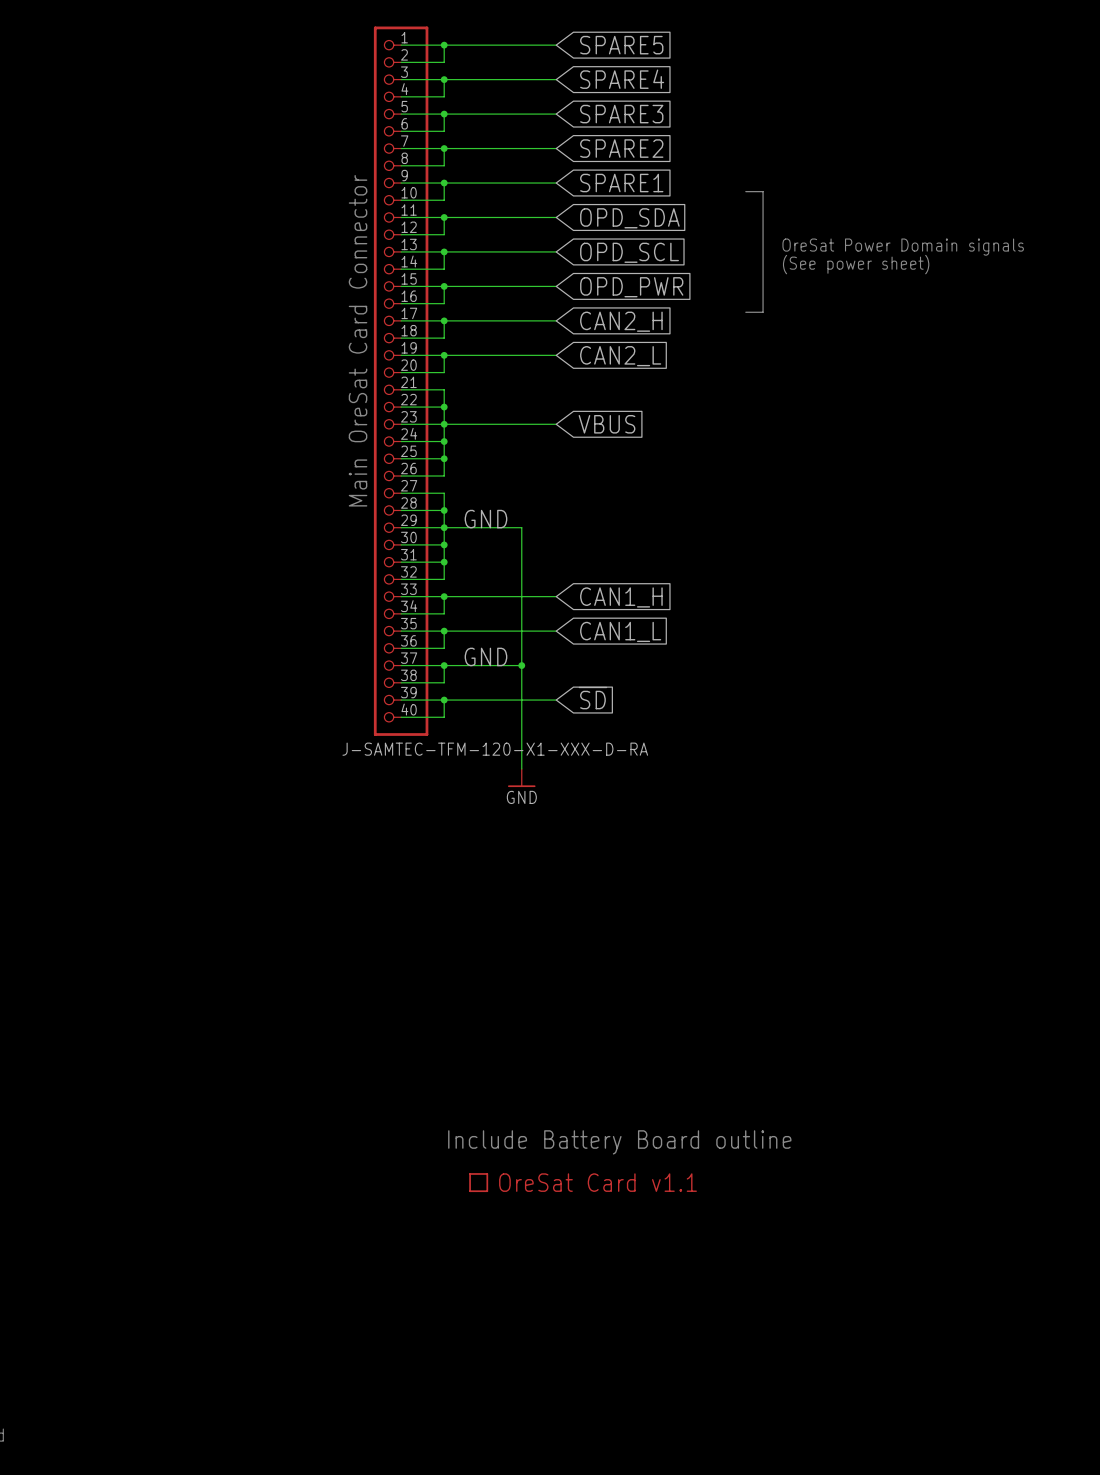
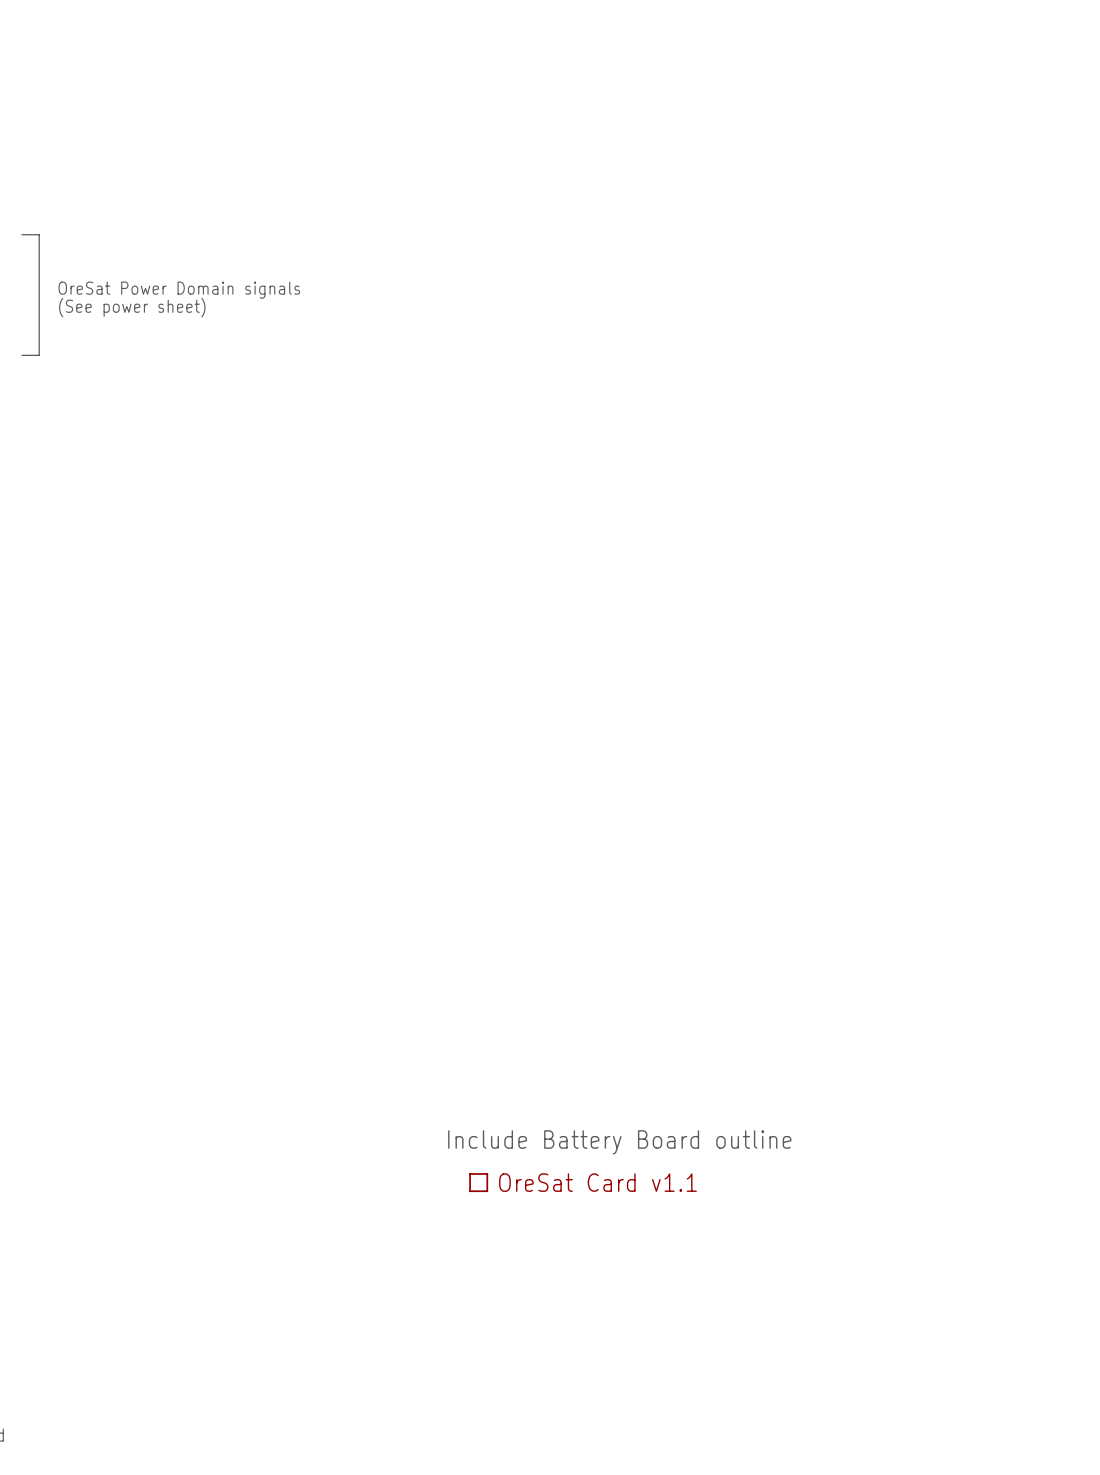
wire: (401, 45) (556, 45) -> none
wire: (444, 45) (444, 62) (401, 62) -> none
junction: (444, 45) -> none
global label: SPARE5 (621, 45) -> none
wire: (401, 79) (556, 79) -> none
wire: (444, 79) (444, 96) (401, 96) -> none
junction: (444, 79) -> none
global label: SPARE4 (622, 79) -> none
wire: (401, 114) (556, 114) -> none
wire: (444, 114) (444, 131) (401, 131) -> none
junction: (444, 114) -> none
global label: SPARE3 (621, 114) -> none
wire: (401, 148) (556, 148) -> none
wire: (444, 148) (444, 165) (401, 165) -> none
junction: (444, 148) -> none
global label: SPARE2 (621, 148) -> none
wire: (401, 183) (556, 183) -> none
wire: (444, 183) (444, 200) (401, 200) -> none
junction: (444, 183) -> none
global label: SPARE1 (621, 183) -> none
line: (745, 191) (763, 191) (763, 312) (745, 312) -> none
wire: (401, 217) (556, 217) -> none
wire: (444, 217) (444, 234) (401, 234) -> none
junction: (444, 217) -> none
global label: OPD_SDA (629, 218) -> none
line: none -> (21, 234) (39, 234) (39, 355) (21, 355)
text: OreSat Power Domain signals (903, 247) -> none
wire: (401, 251) (556, 251) -> none
wire: (444, 251) (444, 269) (401, 269) -> none
junction: (444, 251) -> none
global label: OPD_SCL (629, 252) -> none
text: (See power sheet) (856, 264) -> none
wire: (401, 286) (556, 286) -> none
wire: (444, 286) (444, 303) (401, 303) -> none
junction: (444, 286) -> none
global label: OPD_PWR (631, 287) -> none
text: none -> OreSat Power Domain signals (179, 290)
text: none -> (See power sheet) (132, 307)
wire: (401, 320) (556, 320) -> none
wire: (444, 320) (444, 338) (401, 338) -> none
junction: (444, 320) -> none
global label: CAN2_H (621, 321) -> none
text: Main OreSat Card Connector (358, 340) -> none
wire: (401, 355) (556, 355) -> none
wire: (444, 355) (444, 372) (401, 372) -> none
junction: (444, 355) -> none
global label: CAN2_L (620, 356) -> none
part: J-SAMTEC-TFM-120-X1-XXX-D-RA (401, 381) -> none
wire: (401, 389) (444, 389) (444, 475) (401, 475) -> none
wire: (401, 407) (444, 407) -> none
junction: (444, 407) -> none
wire: (401, 424) (556, 424) -> none
junction: (444, 424) -> none
global label: VBUS (606, 424) -> none
wire: (401, 441) (444, 441) -> none
junction: (444, 441) -> none
wire: (401, 458) (444, 458) -> none
junction: (444, 458) -> none
wire: (401, 493) (444, 493) (444, 579) (401, 579) -> none
wire: (401, 510) (444, 510) -> none
junction: (444, 510) -> none
label: GND (485, 519) -> none
wire: (401, 527) (521, 527) (521, 768) -> none
junction: (444, 527) -> none
wire: (401, 544) (444, 544) -> none
junction: (444, 544) -> none
wire: (401, 562) (444, 562) -> none
junction: (444, 562) -> none
wire: (401, 596) (556, 596) -> none
wire: (444, 596) (444, 613) (401, 613) -> none
junction: (444, 596) -> none
global label: CAN1_H (621, 597) -> none
wire: (401, 631) (556, 631) -> none
wire: (444, 631) (444, 648) (401, 648) -> none
junction: (444, 631) -> none
global label: CAN1_L (620, 631) -> none
label: GND (485, 656) -> none
wire: (401, 665) (521, 665) -> none
wire: (444, 665) (444, 682) (401, 682) -> none
junction: (444, 665) -> none
junction: (521, 665) -> none
global label: ~{SD} (592, 698) -> none
wire: (401, 700) (556, 700) -> none
wire: (444, 700) (444, 717) (401, 717) -> none
junction: (444, 700) -> none
power symbol: GND (521, 778) -> none

